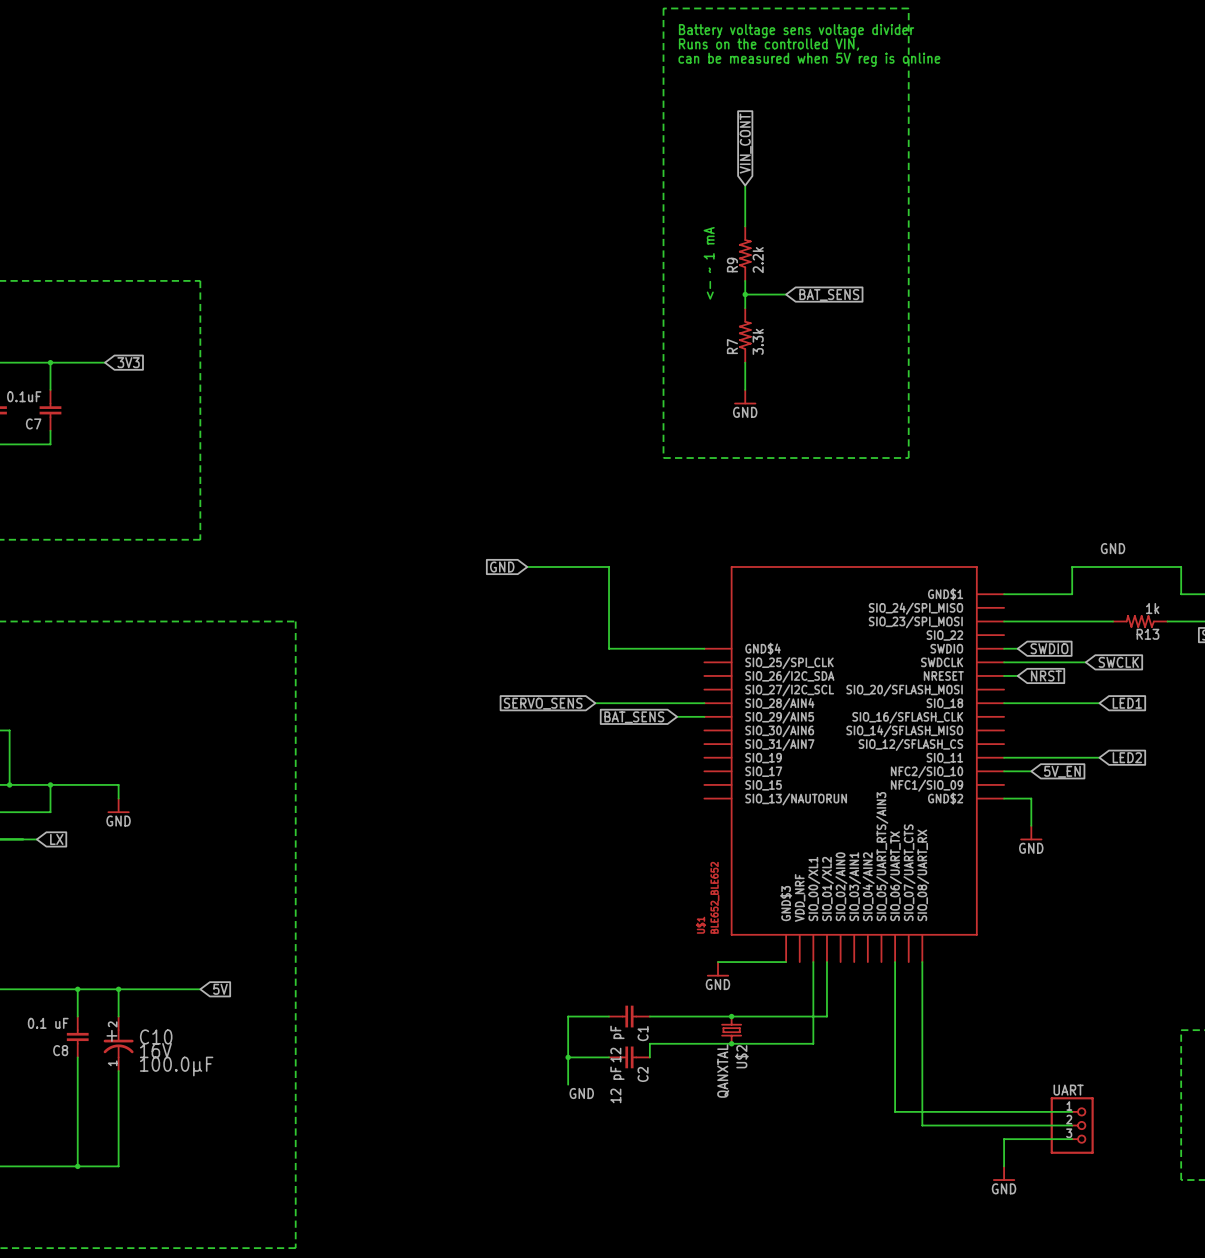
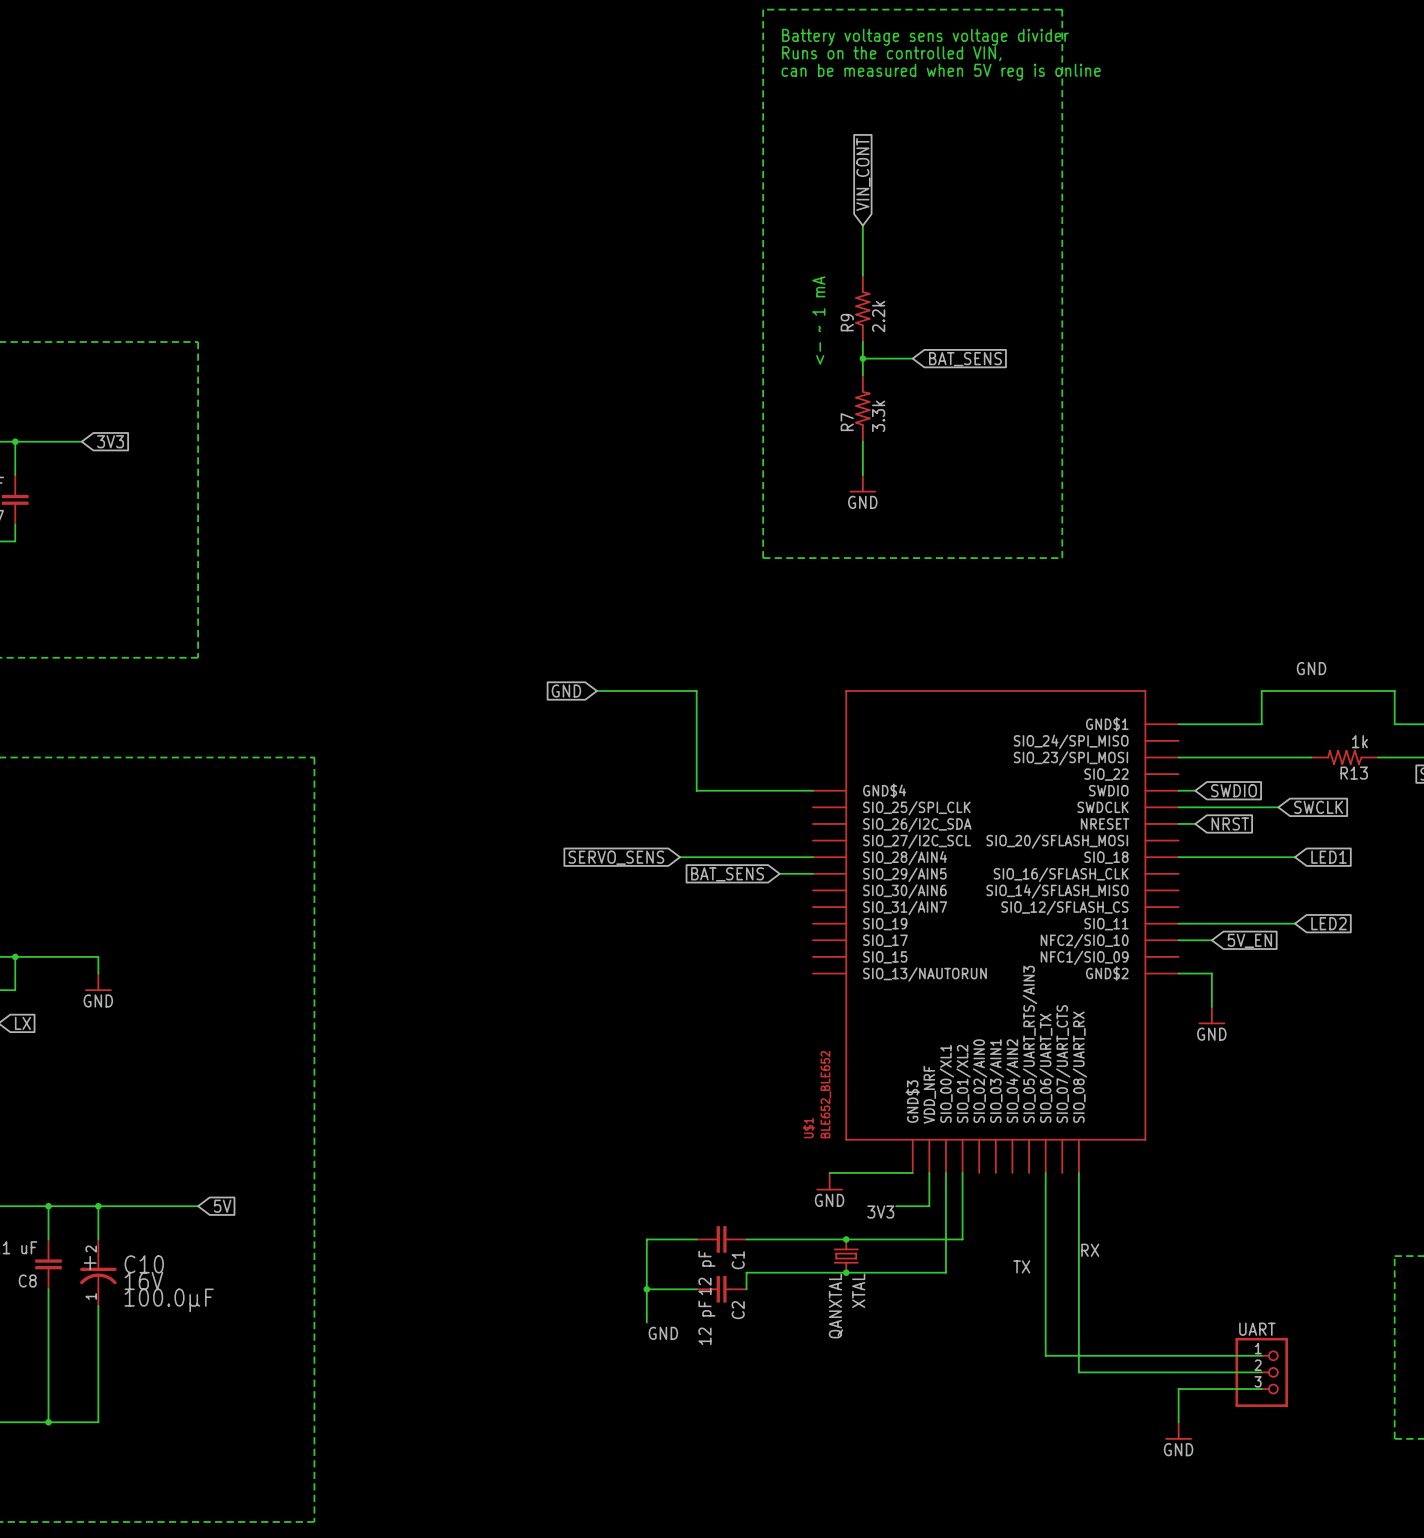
wire: none -> (929, 1172) (929, 1206) (896, 1206)
label: none -> 3V3 (880, 1212)
label: none -> RX (1090, 1250)
label: none -> TX (1021, 1266)
U$2 name: U$2 (741, 1056) -> XTAL (858, 1290)

